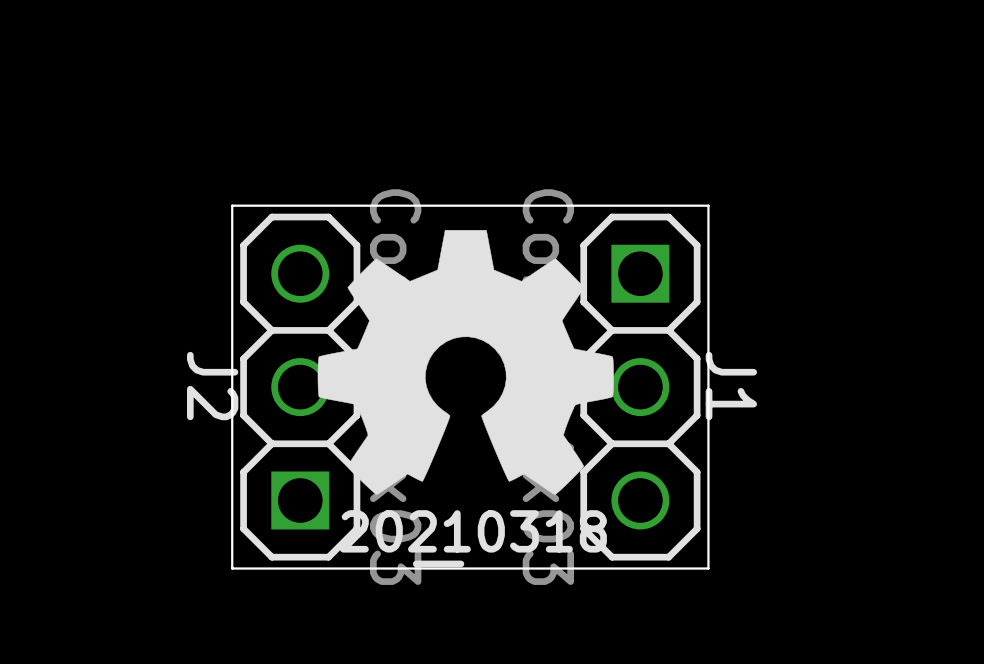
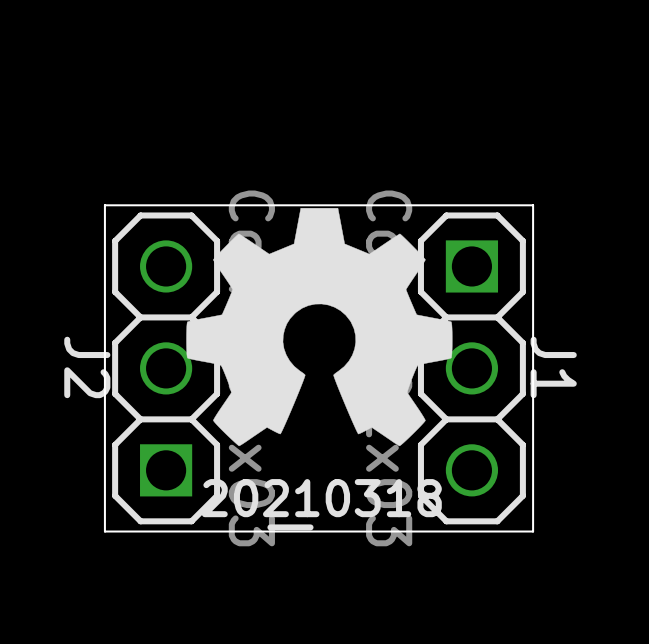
drawing position: (465, 362) -> (319, 327)

